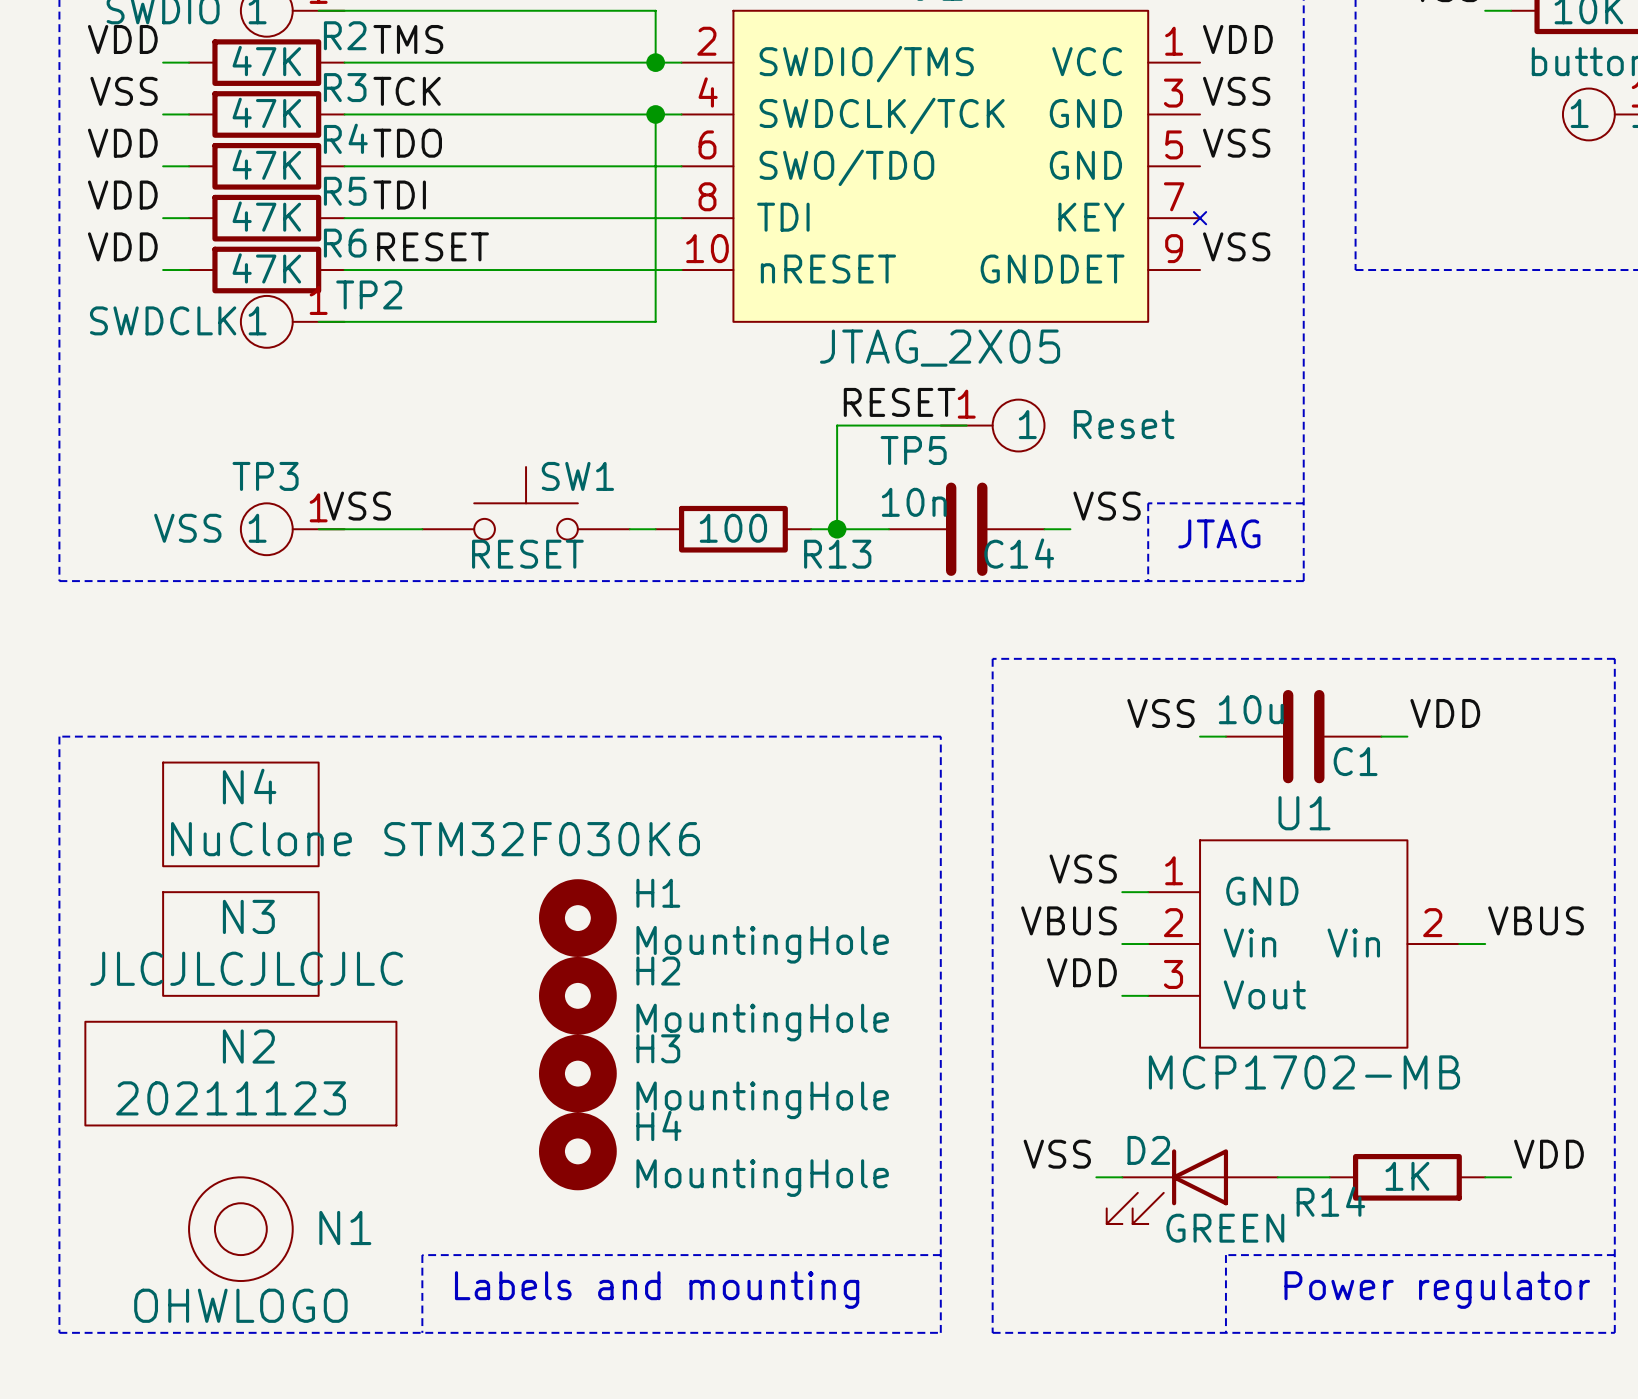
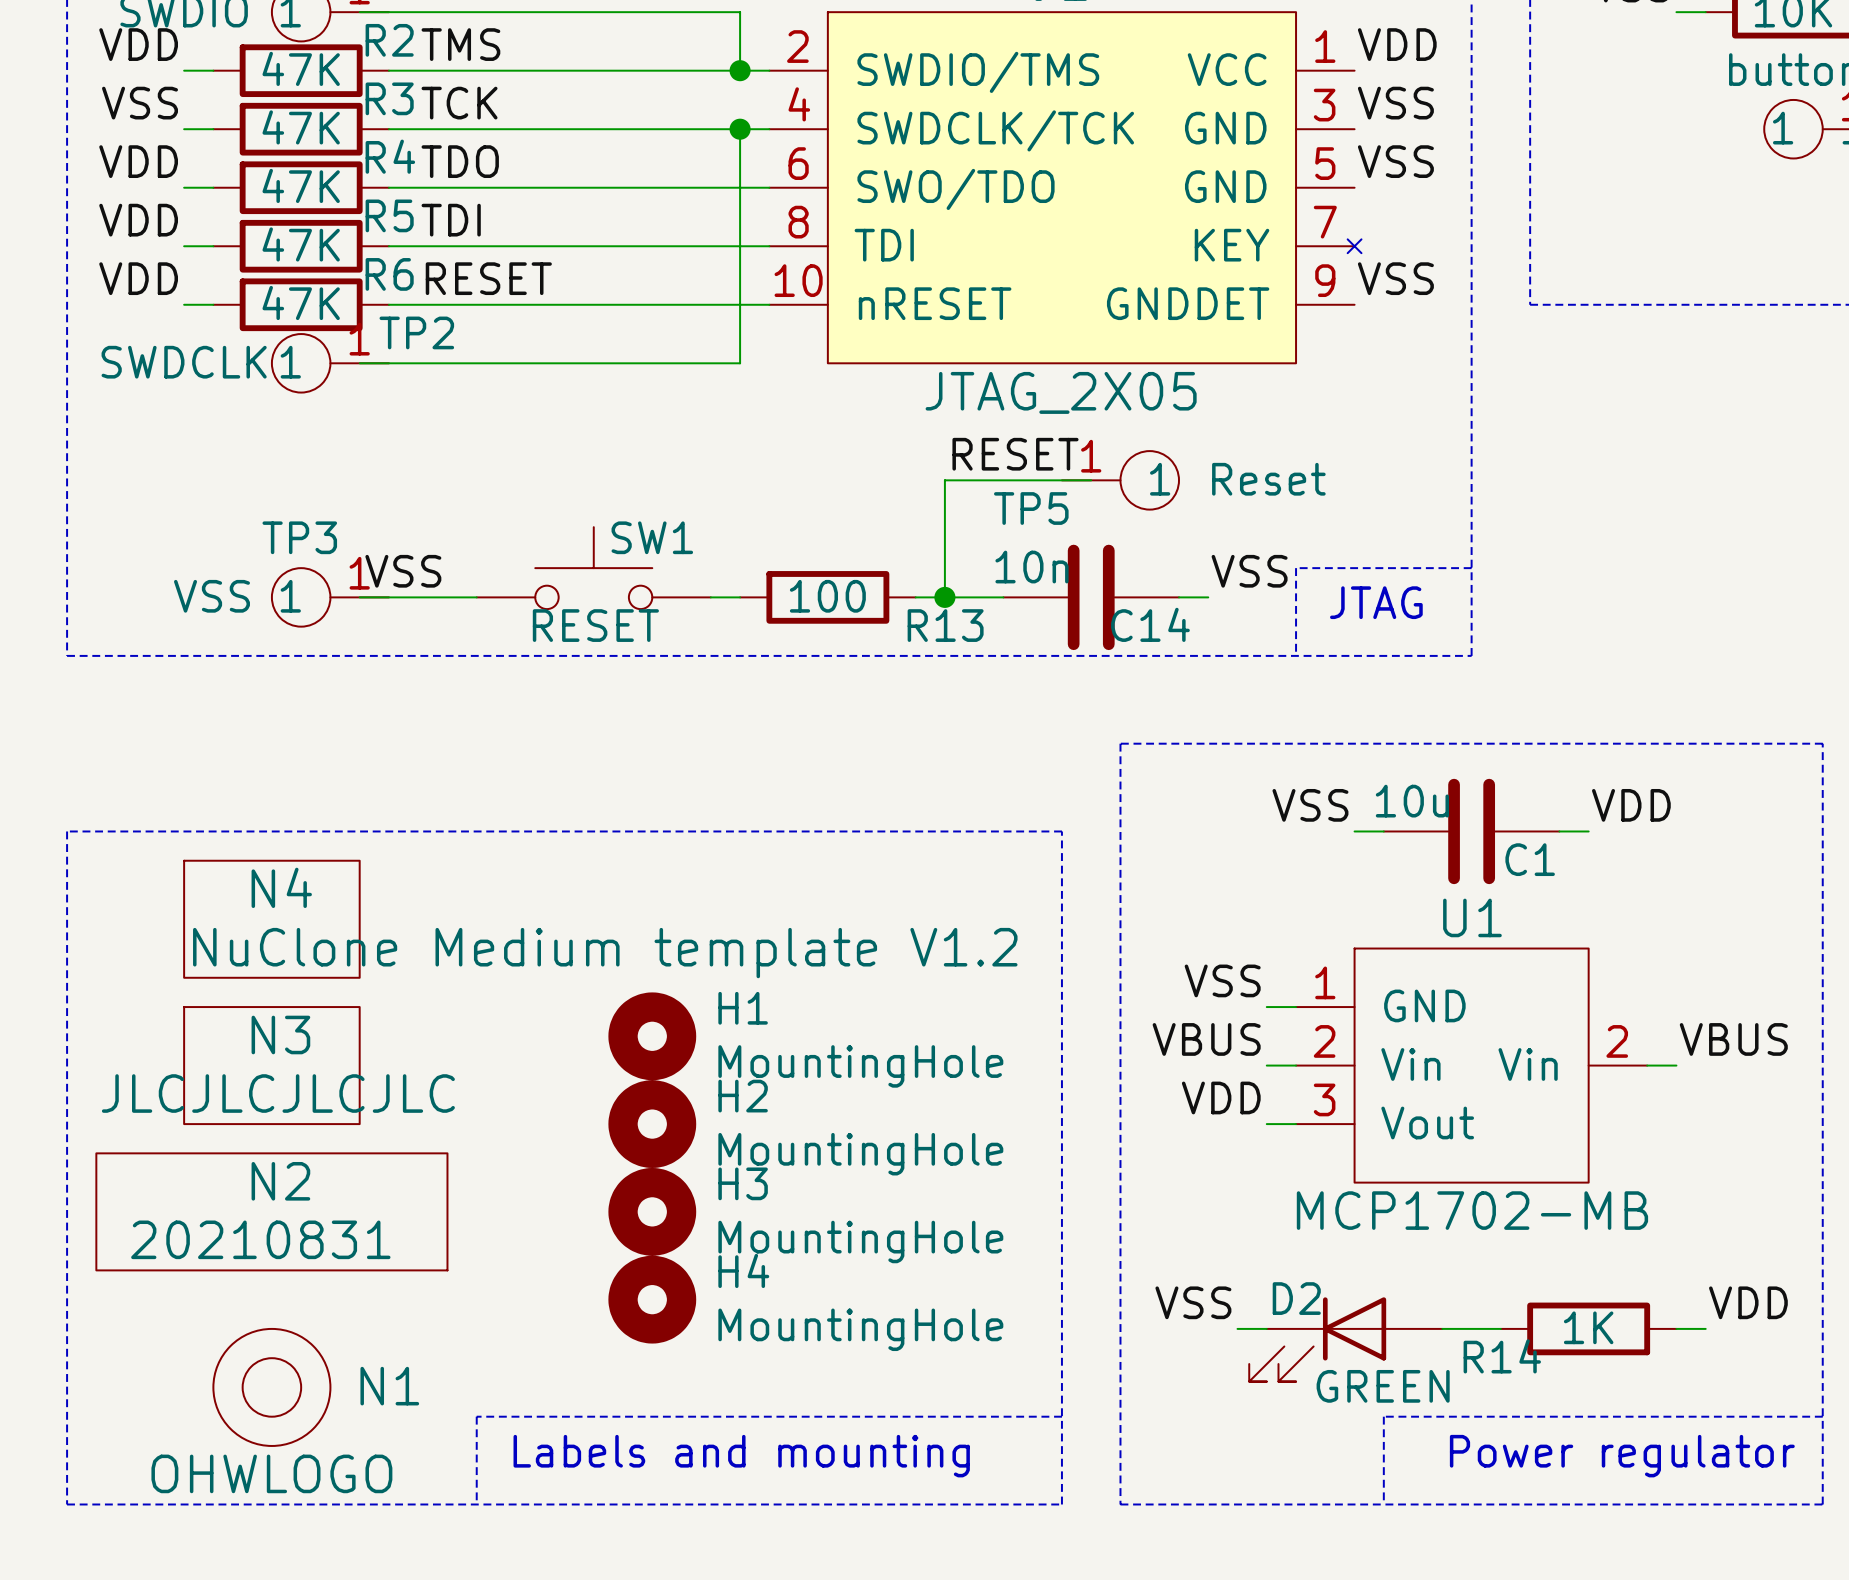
N4 value: NuClone STM32F030K6 (435, 839) -> NuClone Medium template V1.2 (605, 953)
N2 value: 20211123 (231, 1098) -> 20210831 (260, 1239)

